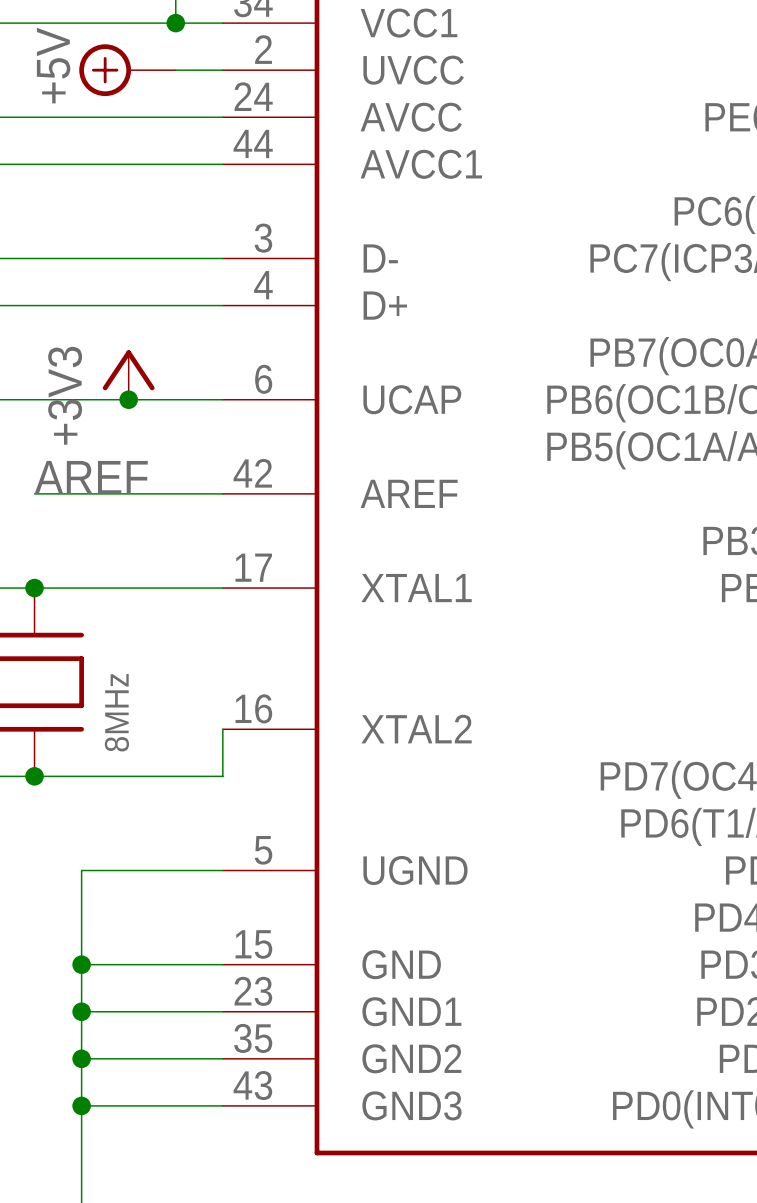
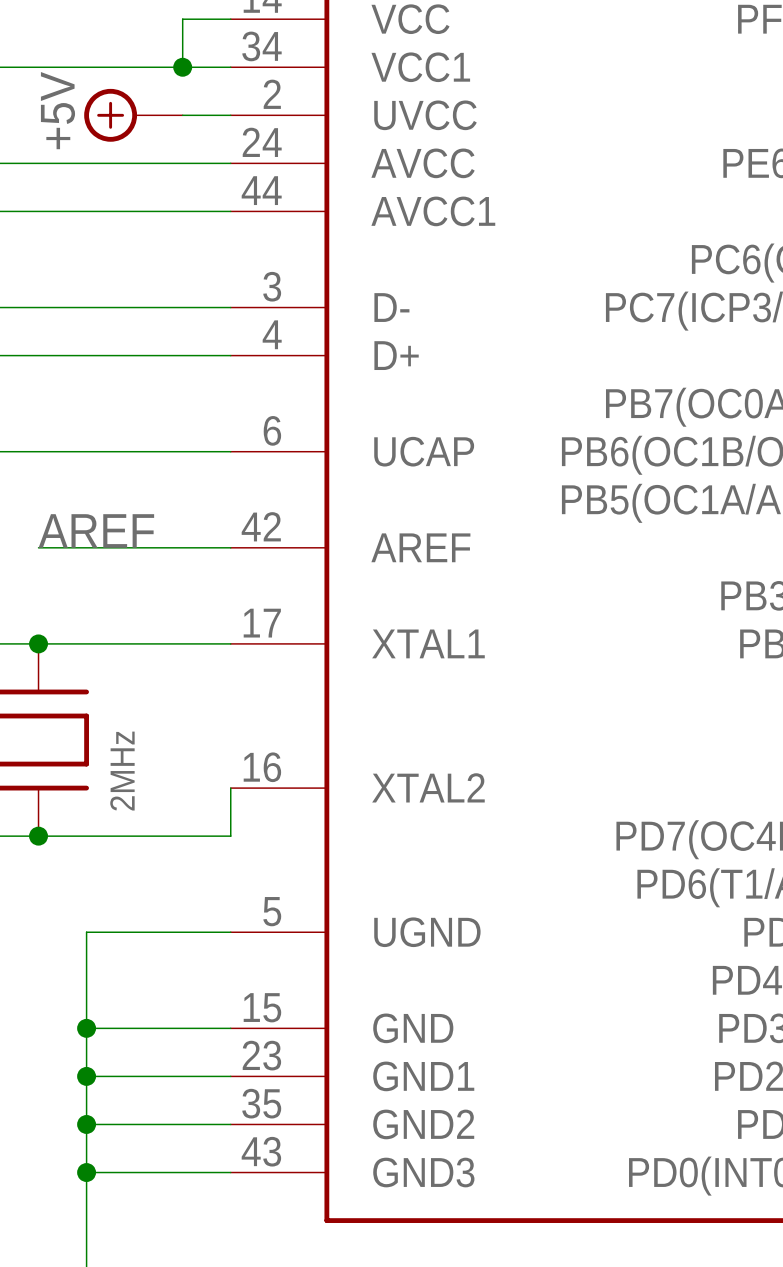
power symbol: +3V3 (128, 375) -> none
junction: (128, 399) -> none
part value: 8MHz (116, 712) -> 2MHz (122, 771)

